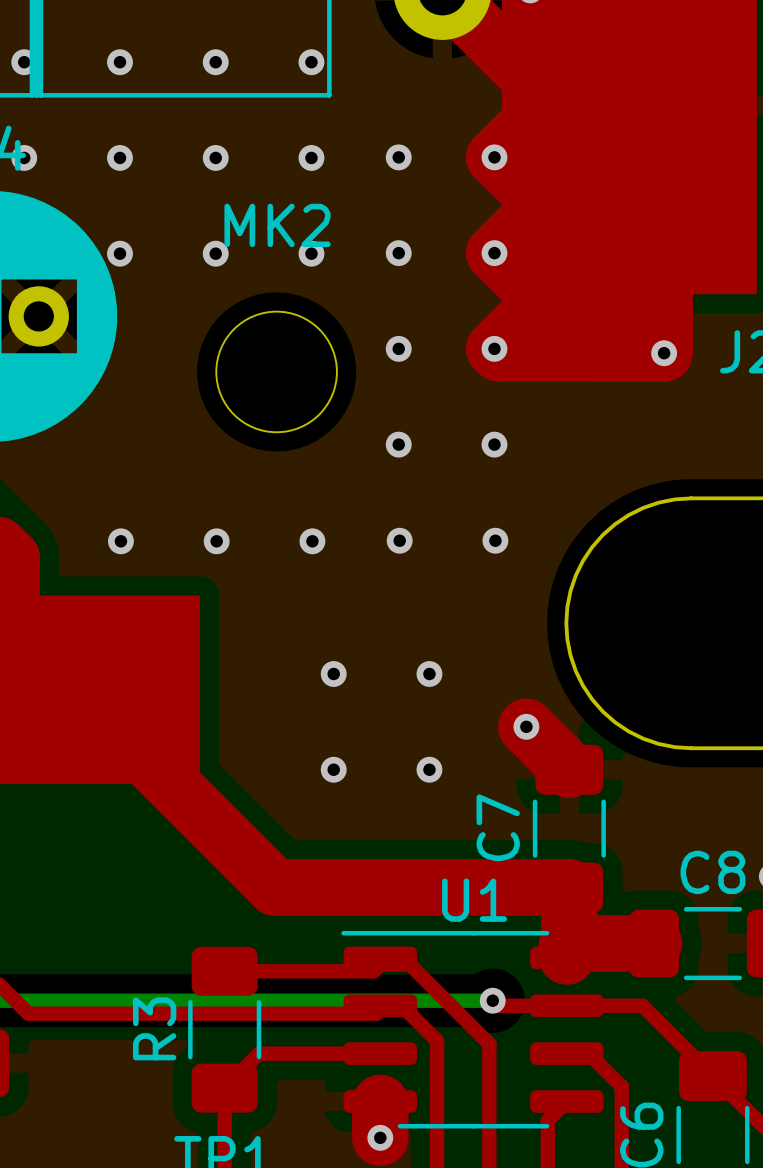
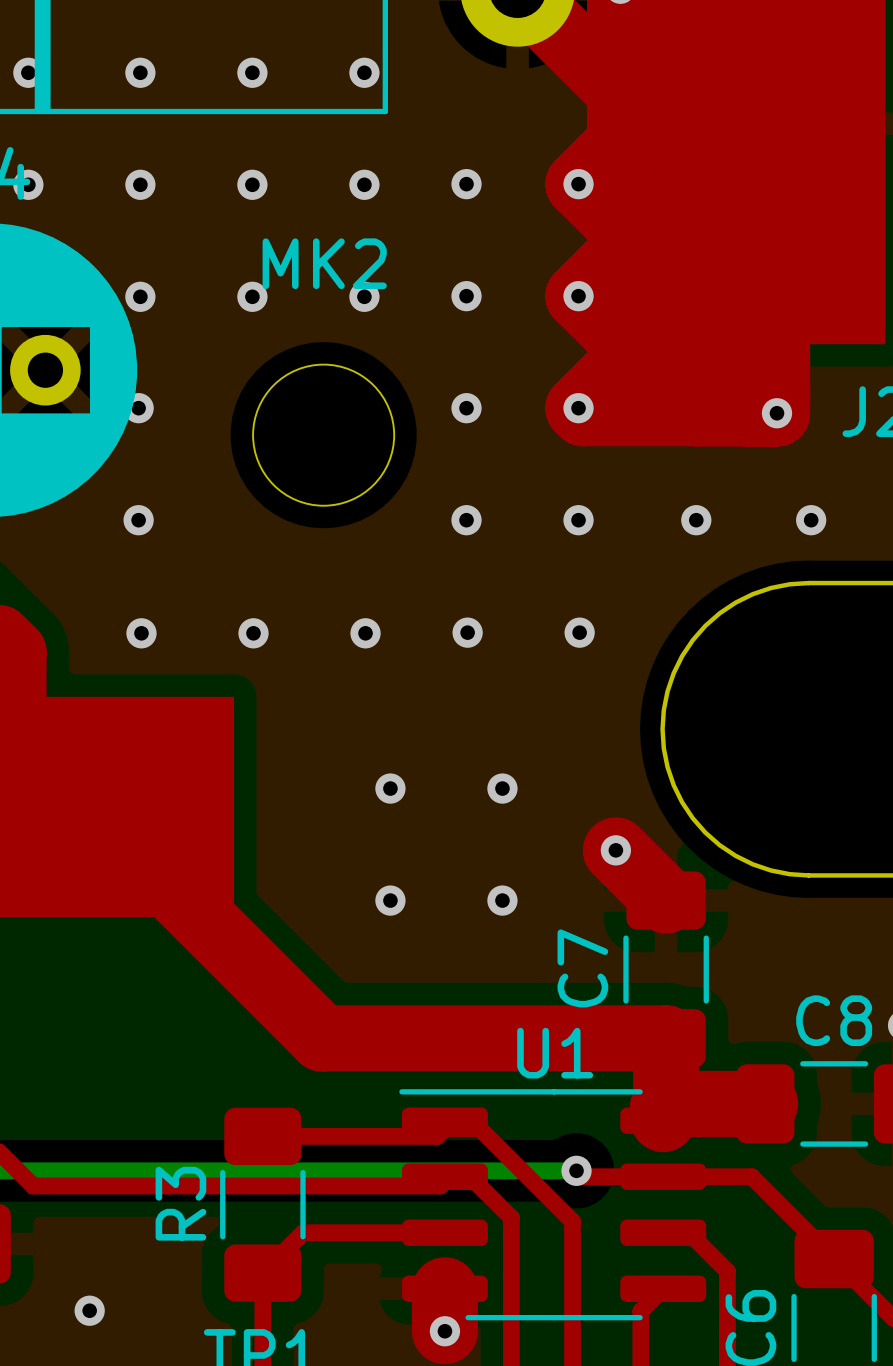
via: none -> (138, 408)
via: none -> (138, 520)
via: none -> (696, 520)
via: none -> (811, 520)
via: none -> (89, 1310)

